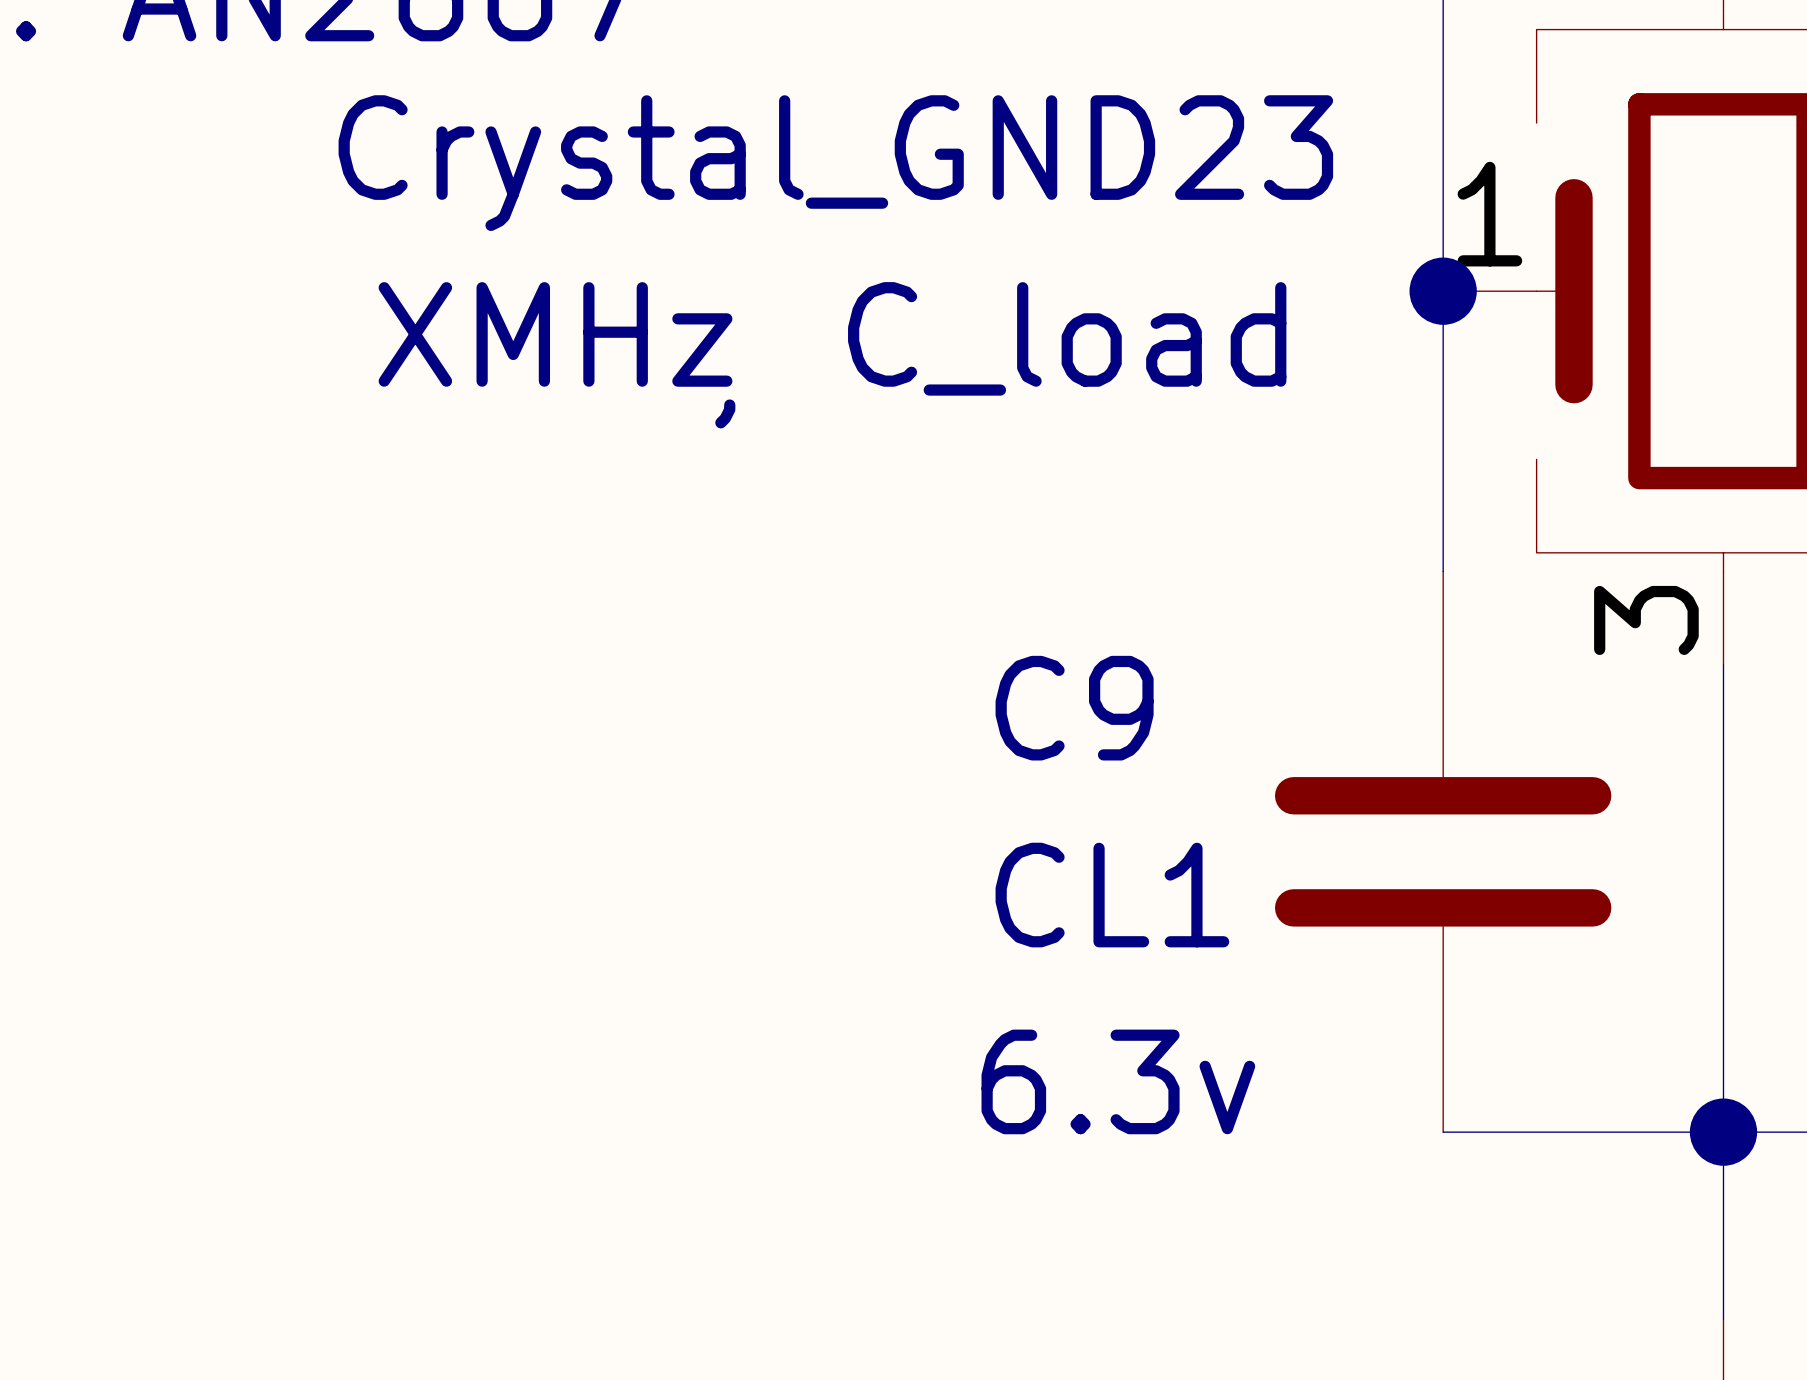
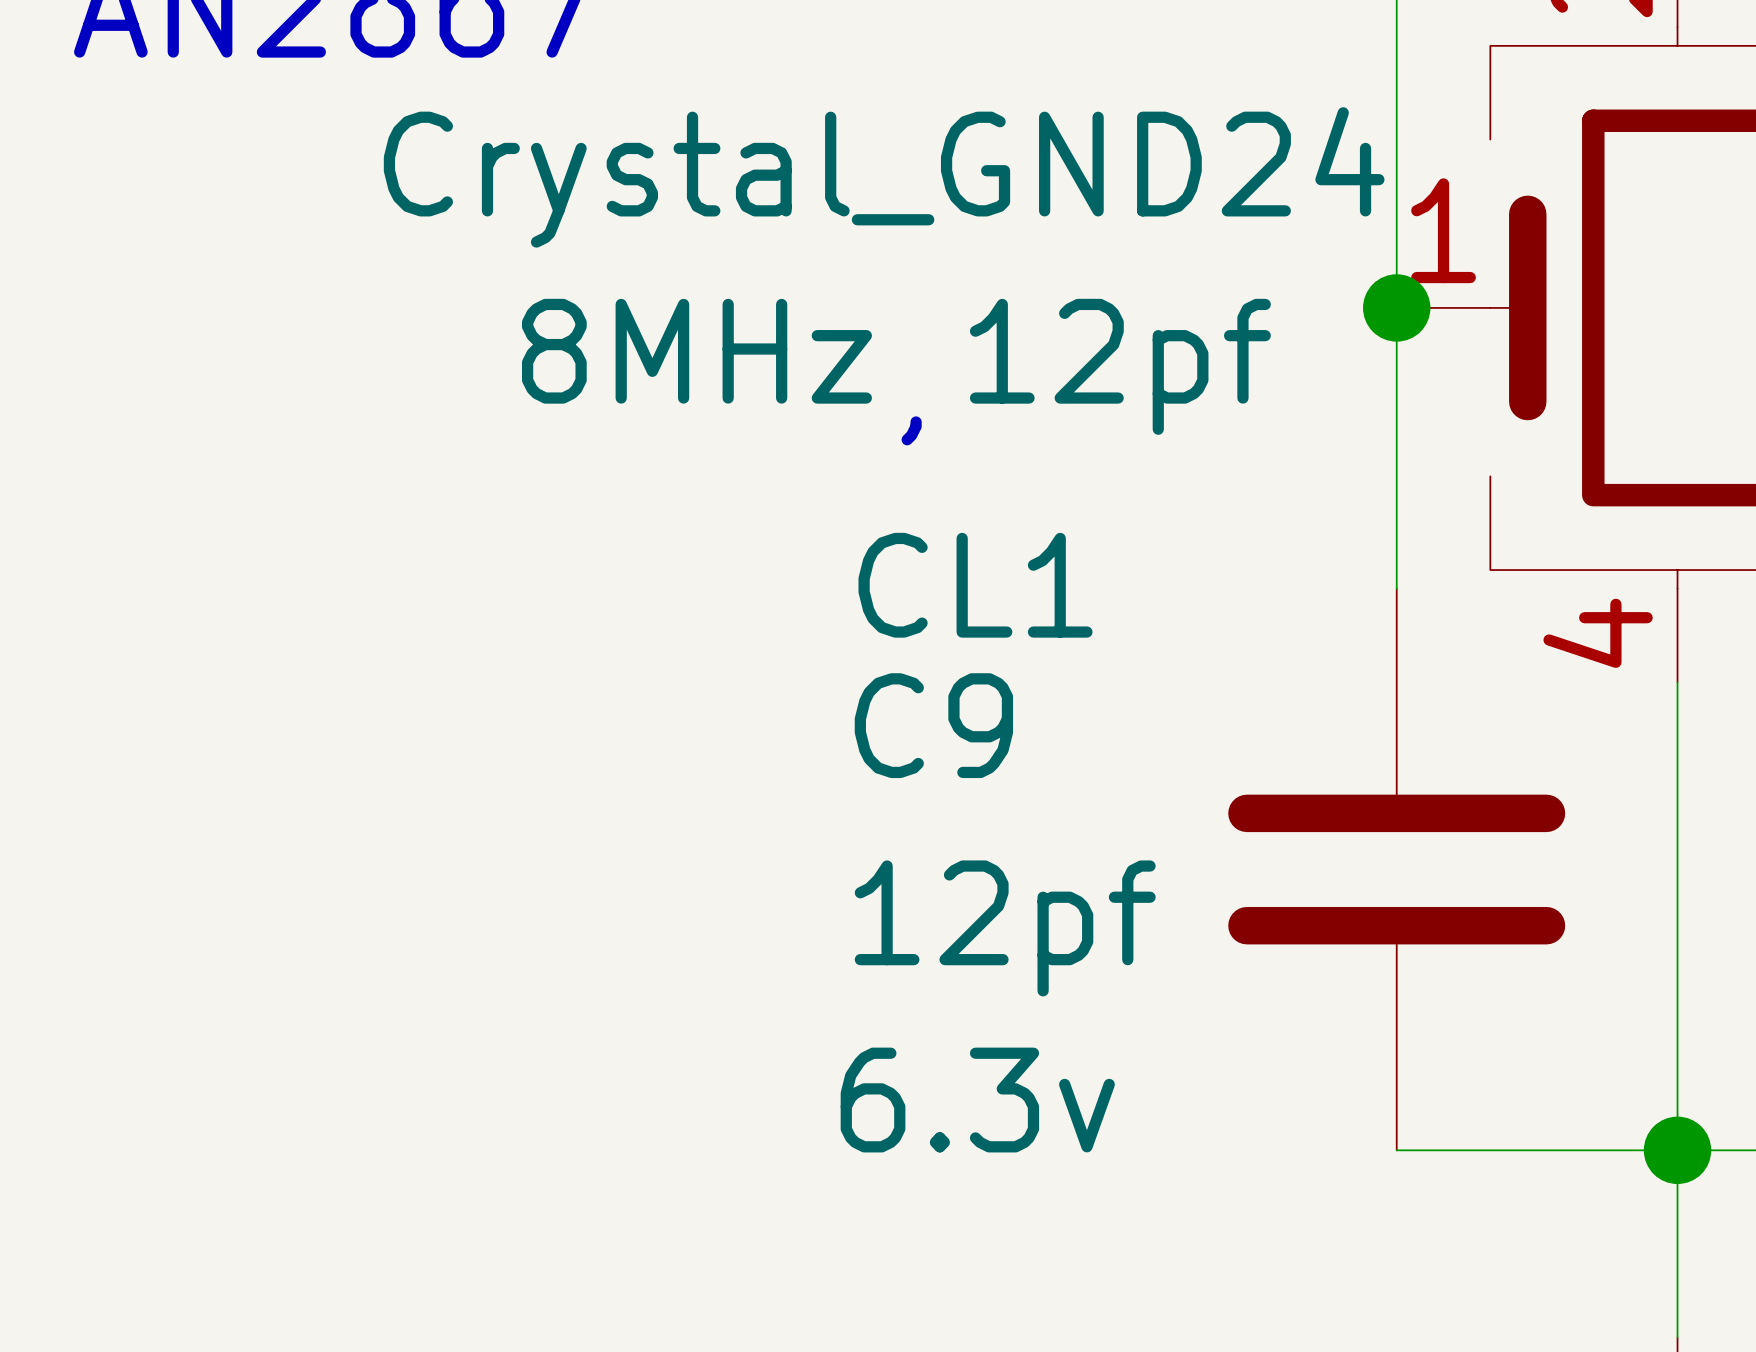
part value: Crystal_GND23 (835, 163) -> Crystal_GND24 (884, 177)
part text: XMHz (555, 334) -> 8MHz (696, 351)
part text: C_load (1067, 338) -> 12pf (1120, 366)
text position: , (725, 413) -> , (911, 430)
C9 text: none -> CL1 (975, 585)
part pin number: 3 (1646, 620) -> 4 (1598, 633)
C9 name position: C9 (1074, 708) -> C9 (933, 725)
C9 value: CL1 (1112, 895) -> 12pf (1005, 928)
C9 text position: 6.3v (1118, 1081) -> 6.3v (977, 1100)

